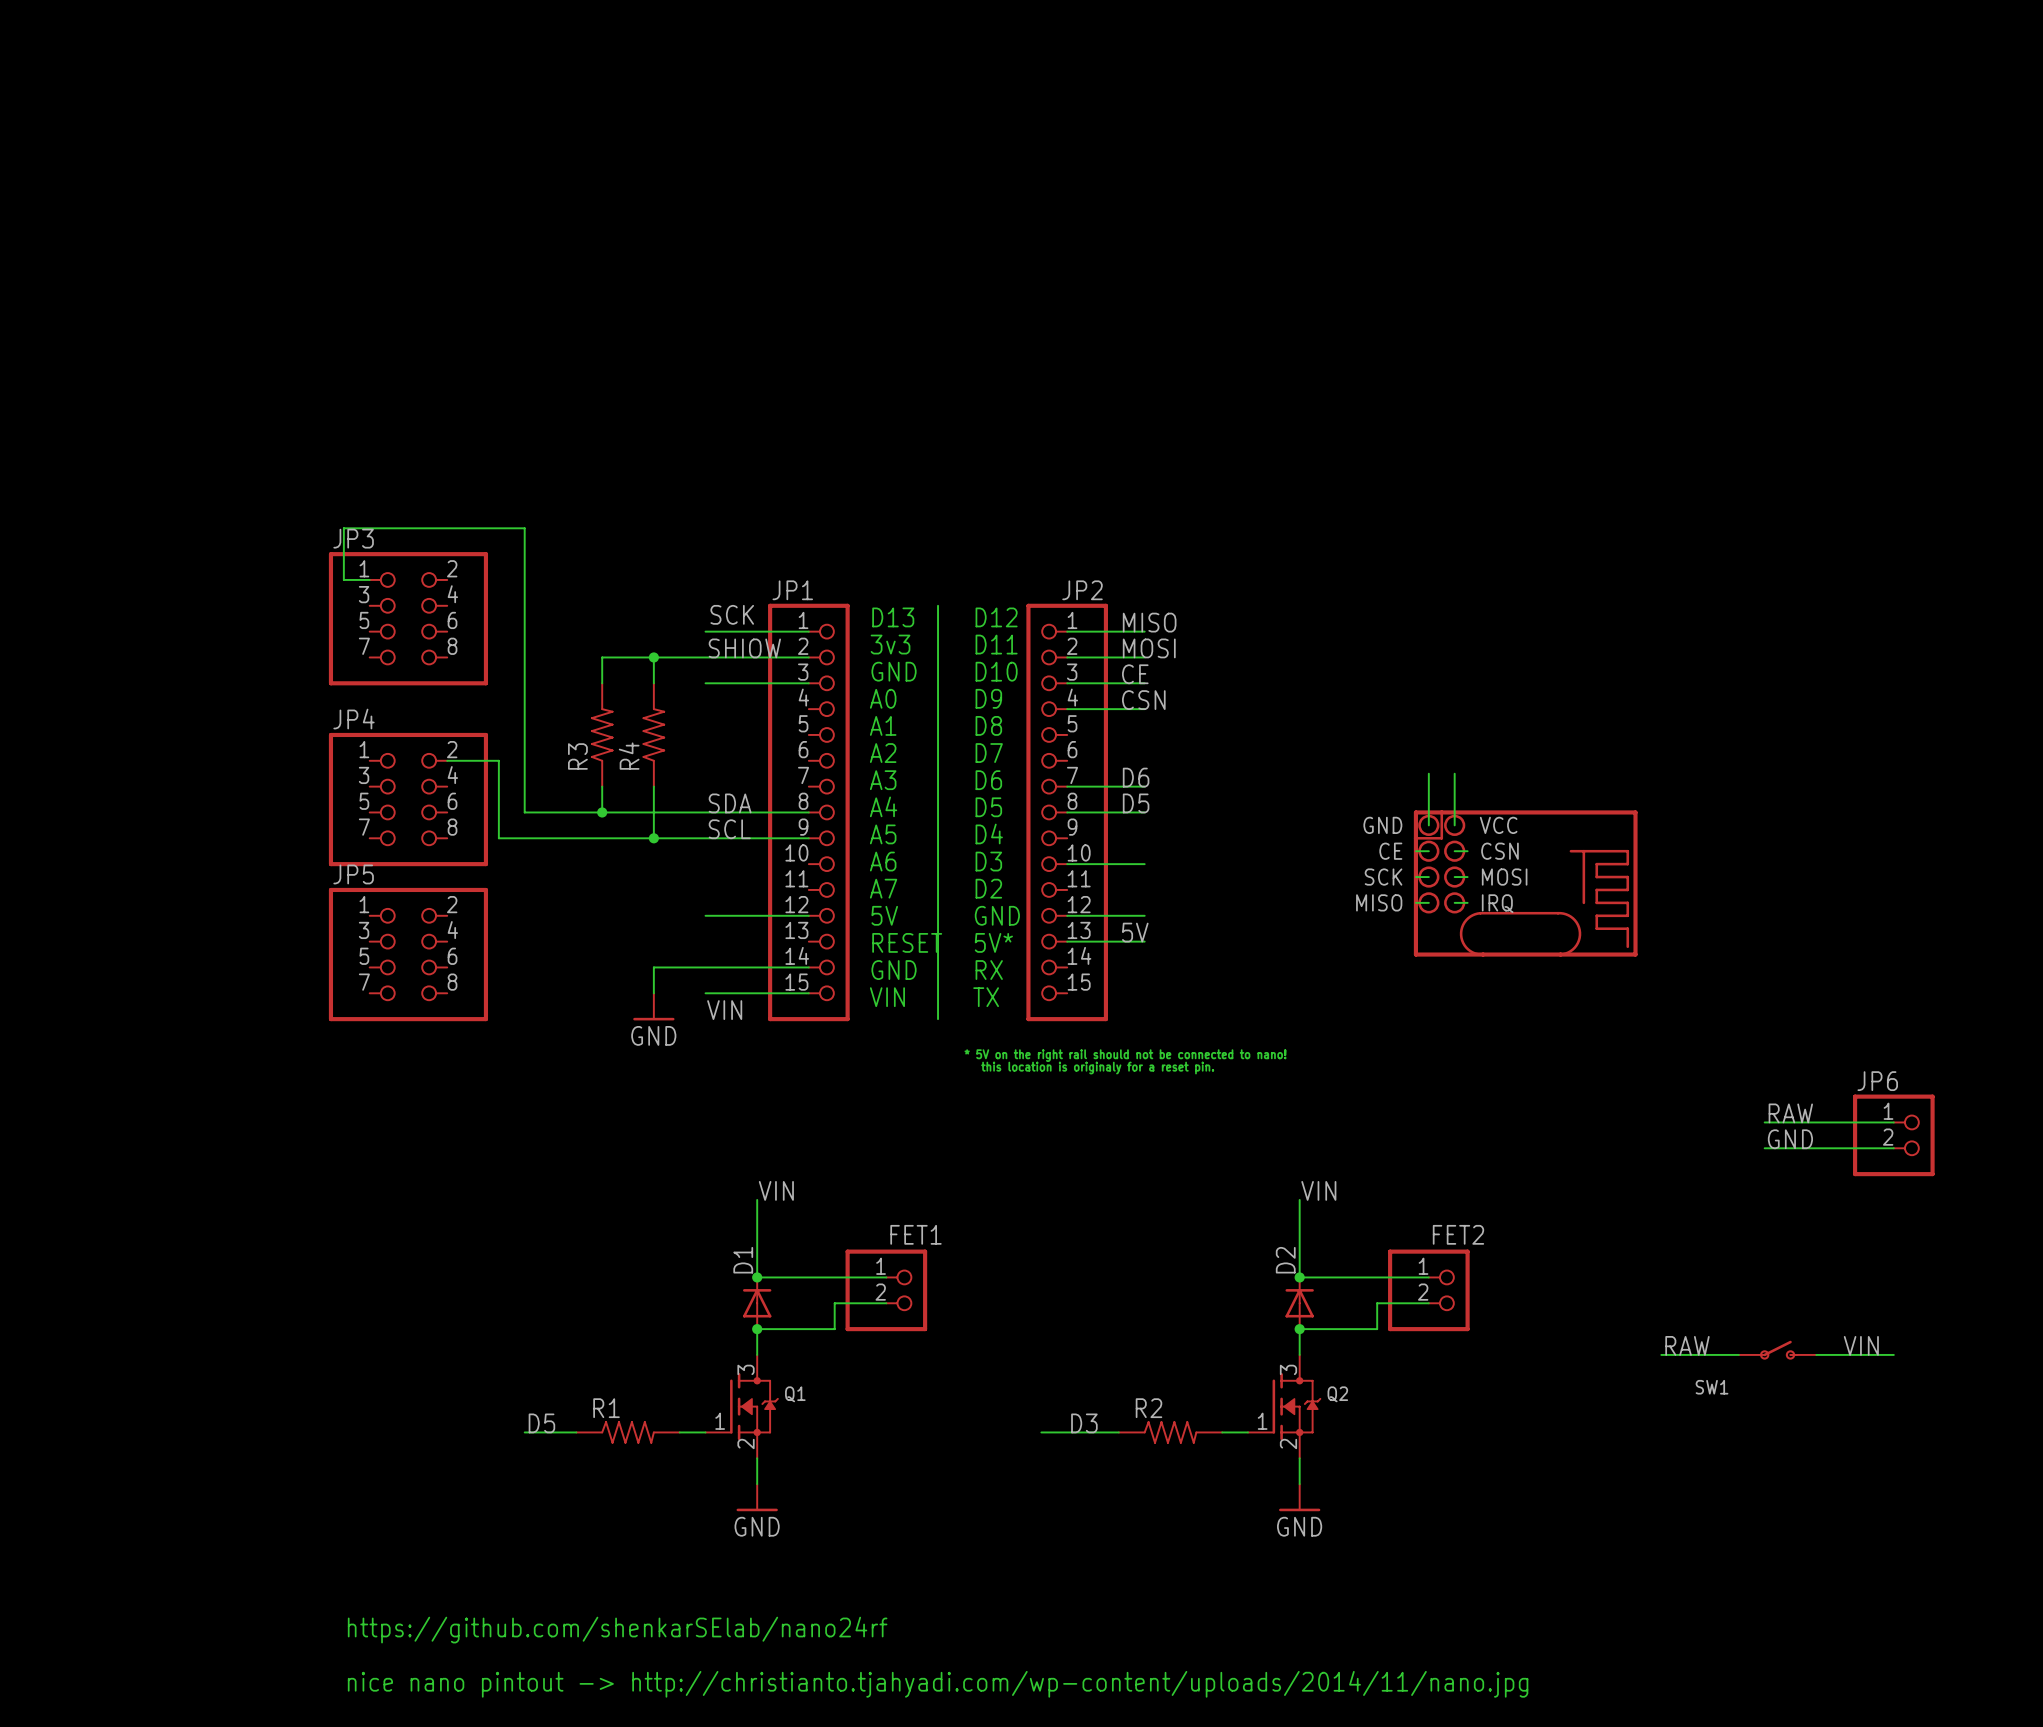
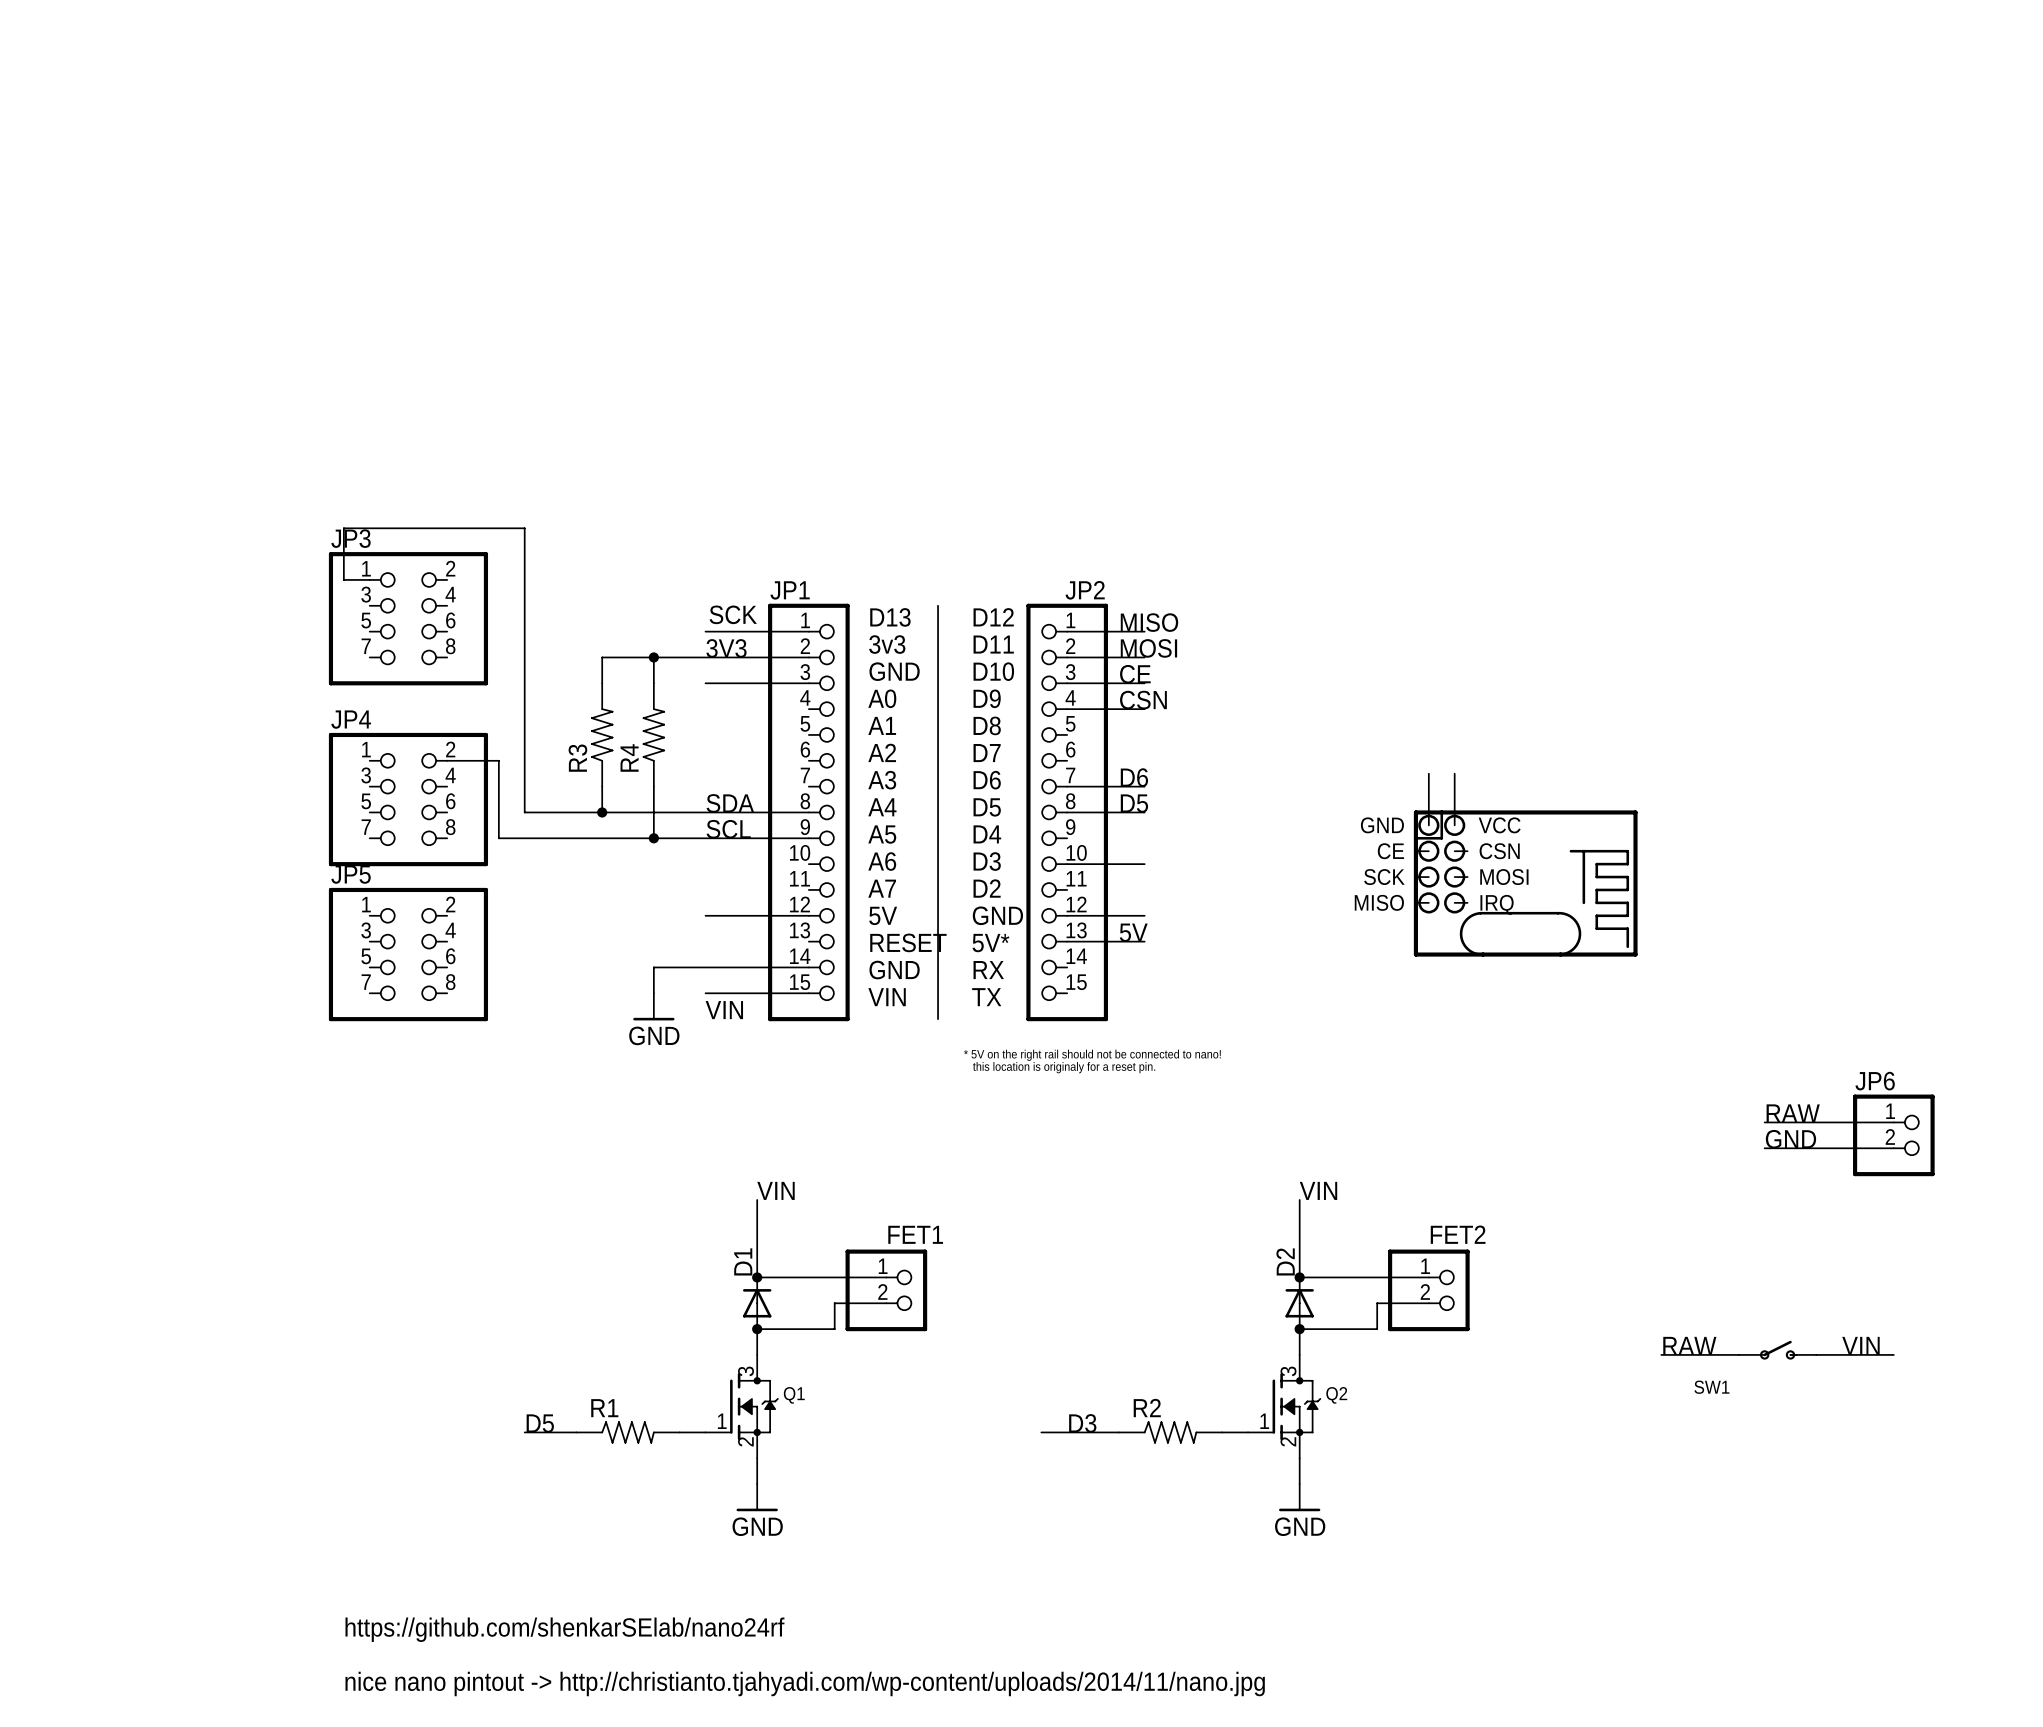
label: SHIOW (744, 648) -> 3V3 (726, 648)

